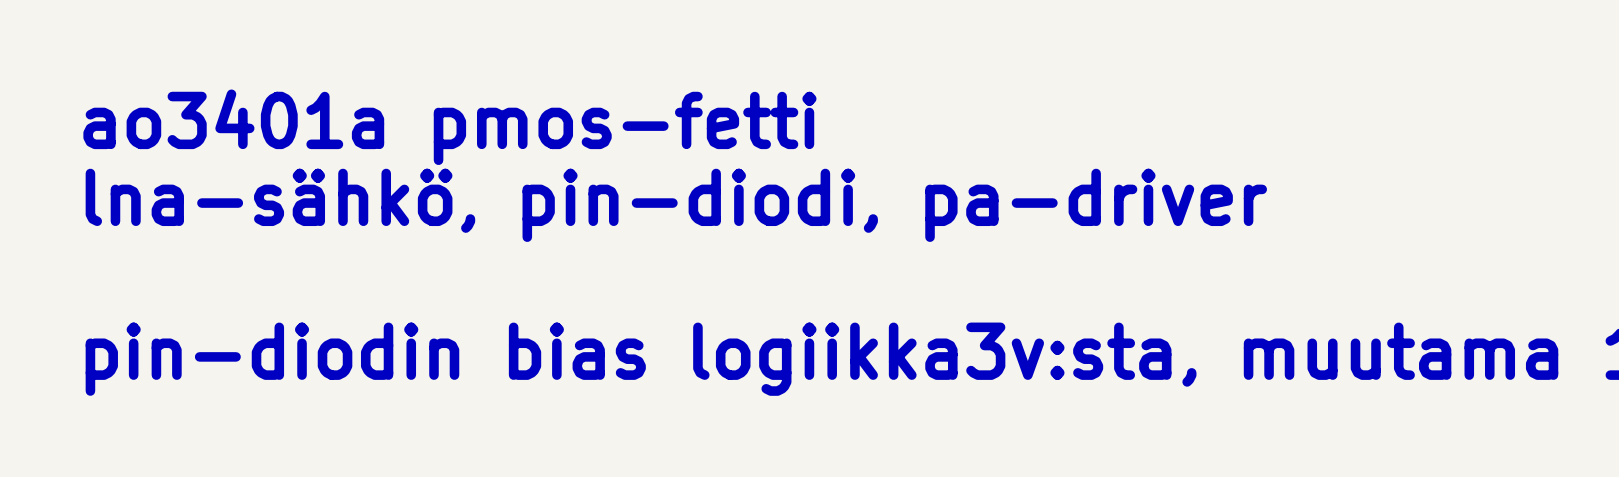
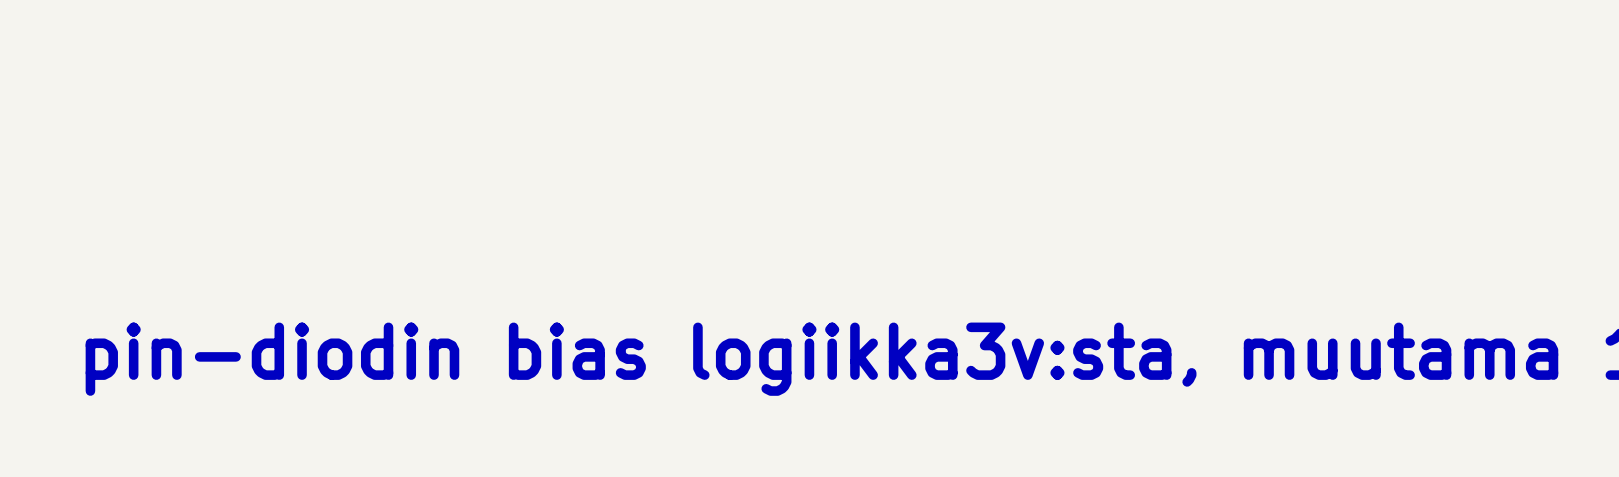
text: ao3401a pmos-fetti (449, 127) -> none
text: lna-sähkö, pin-diodi, pa-driver (676, 205) -> none

